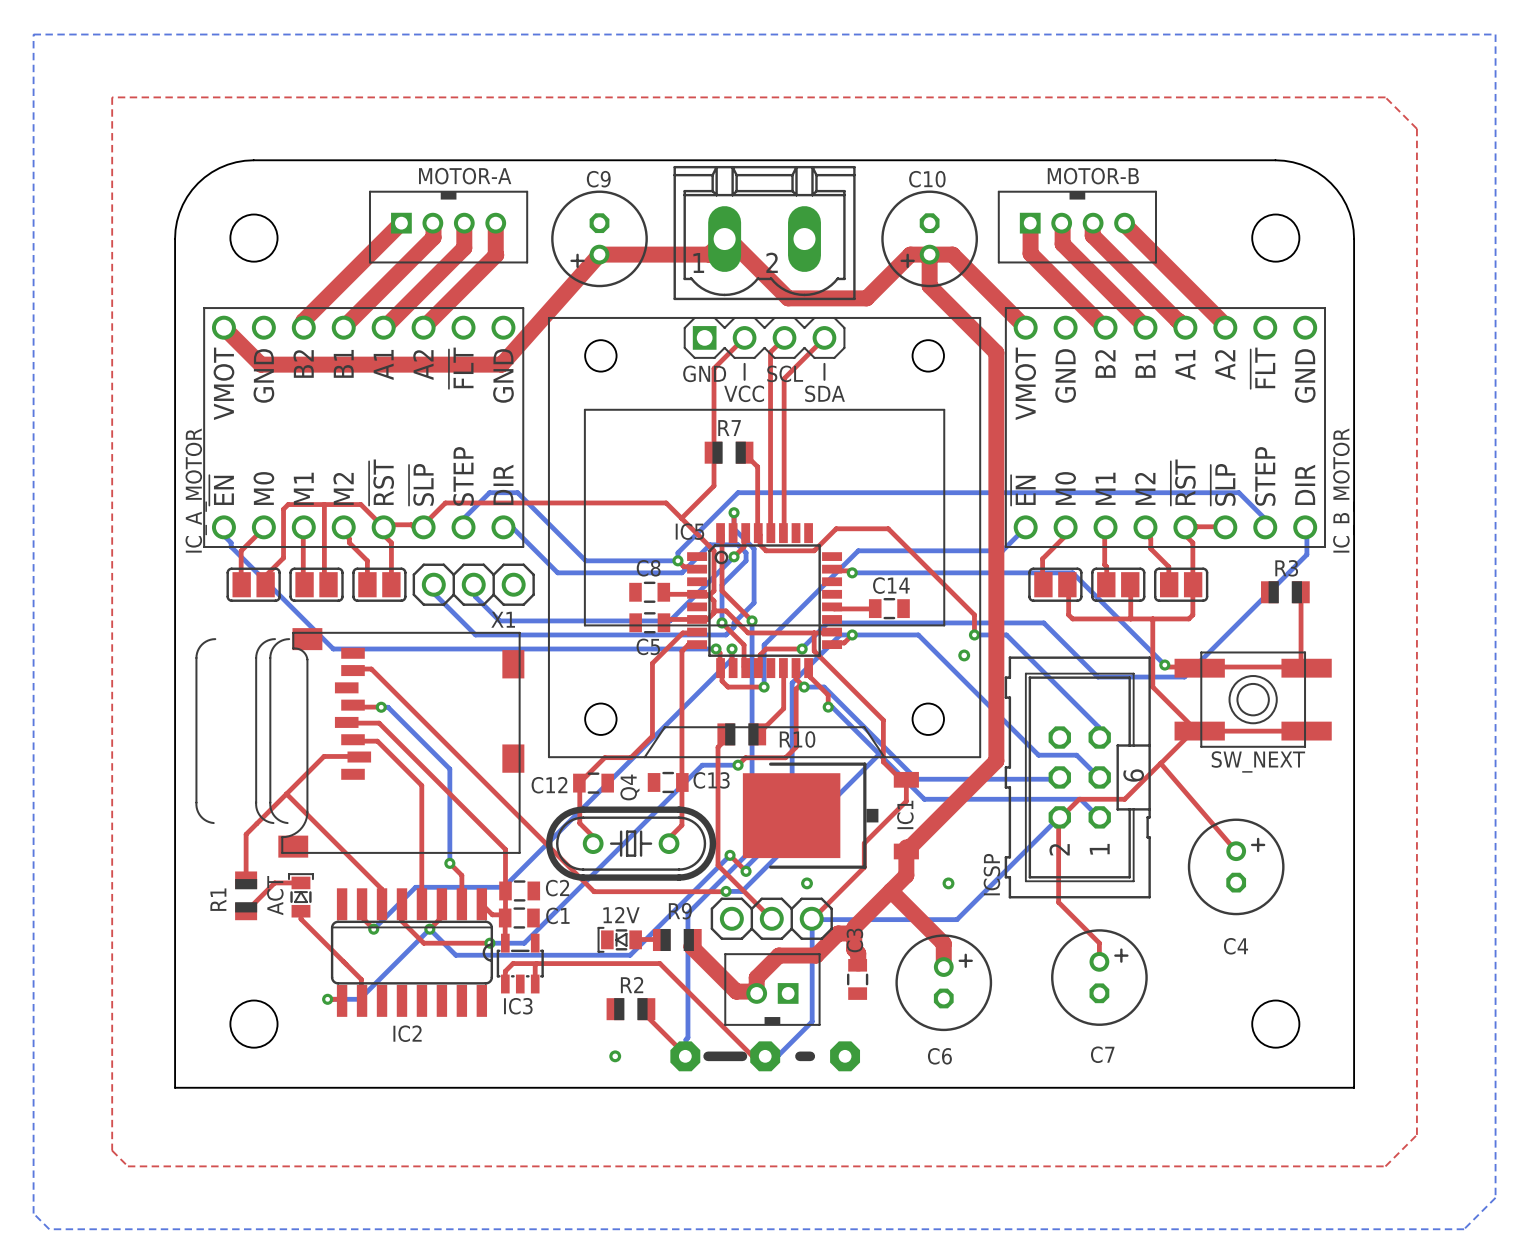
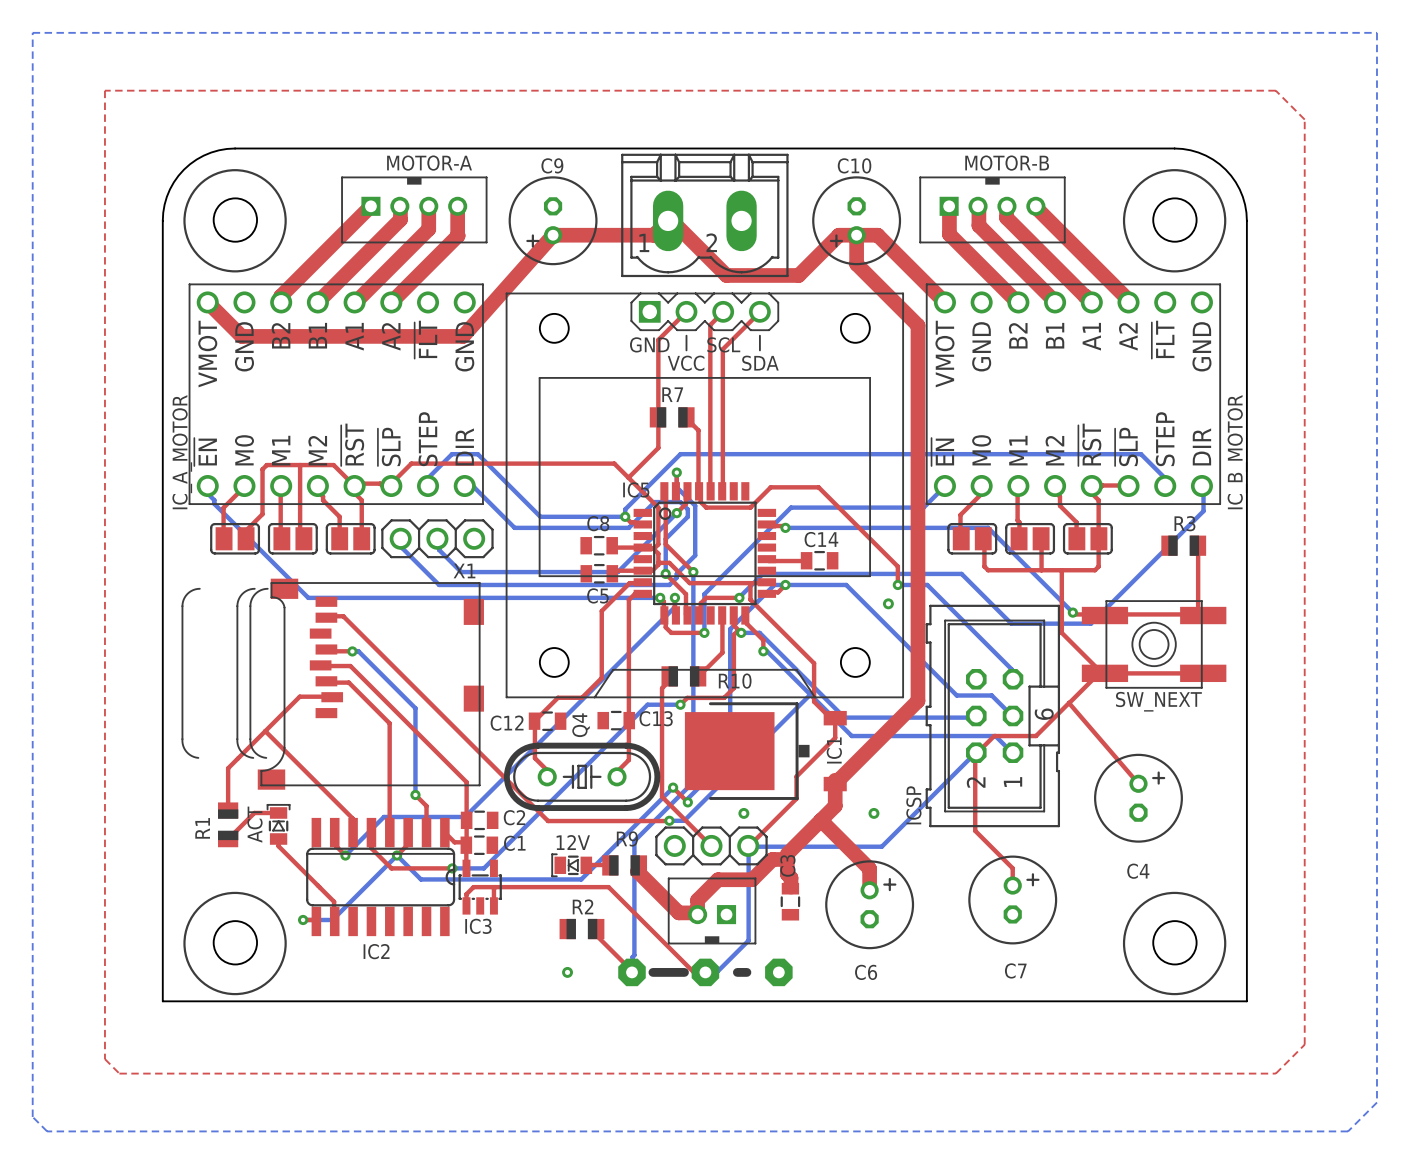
drawing: none -> [183, 169, 287, 273]
drawing: none -> [1122, 169, 1227, 273]
drawing: none -> [183, 891, 287, 996]
drawing: none -> [1122, 891, 1227, 996]

